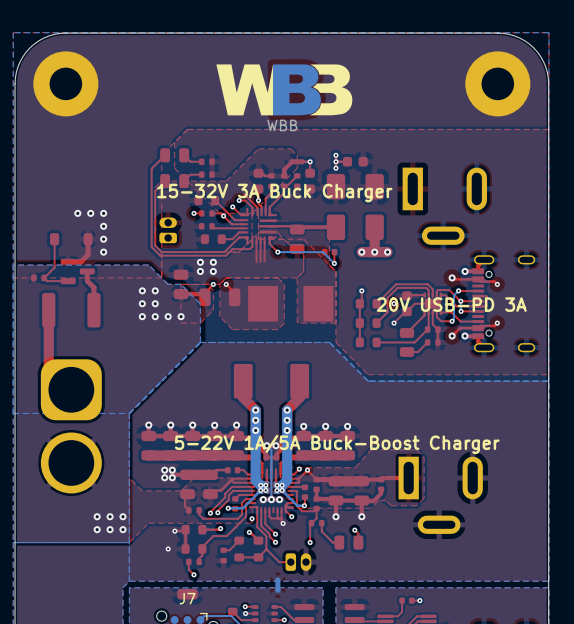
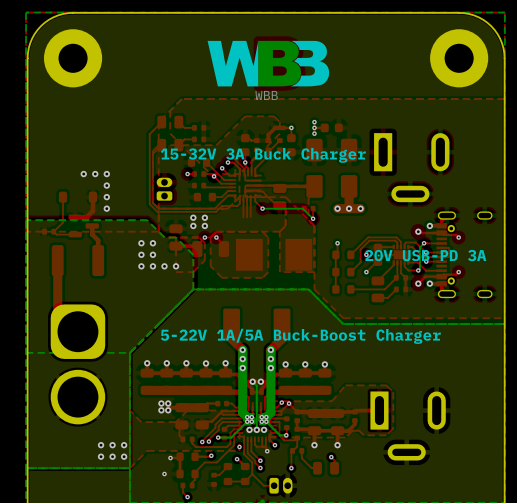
text position: 5-22V 1A/5A Buck-Boost Charger (337, 444) -> 5-22V 1A/5A Buck-Boost Charger (300, 336)

